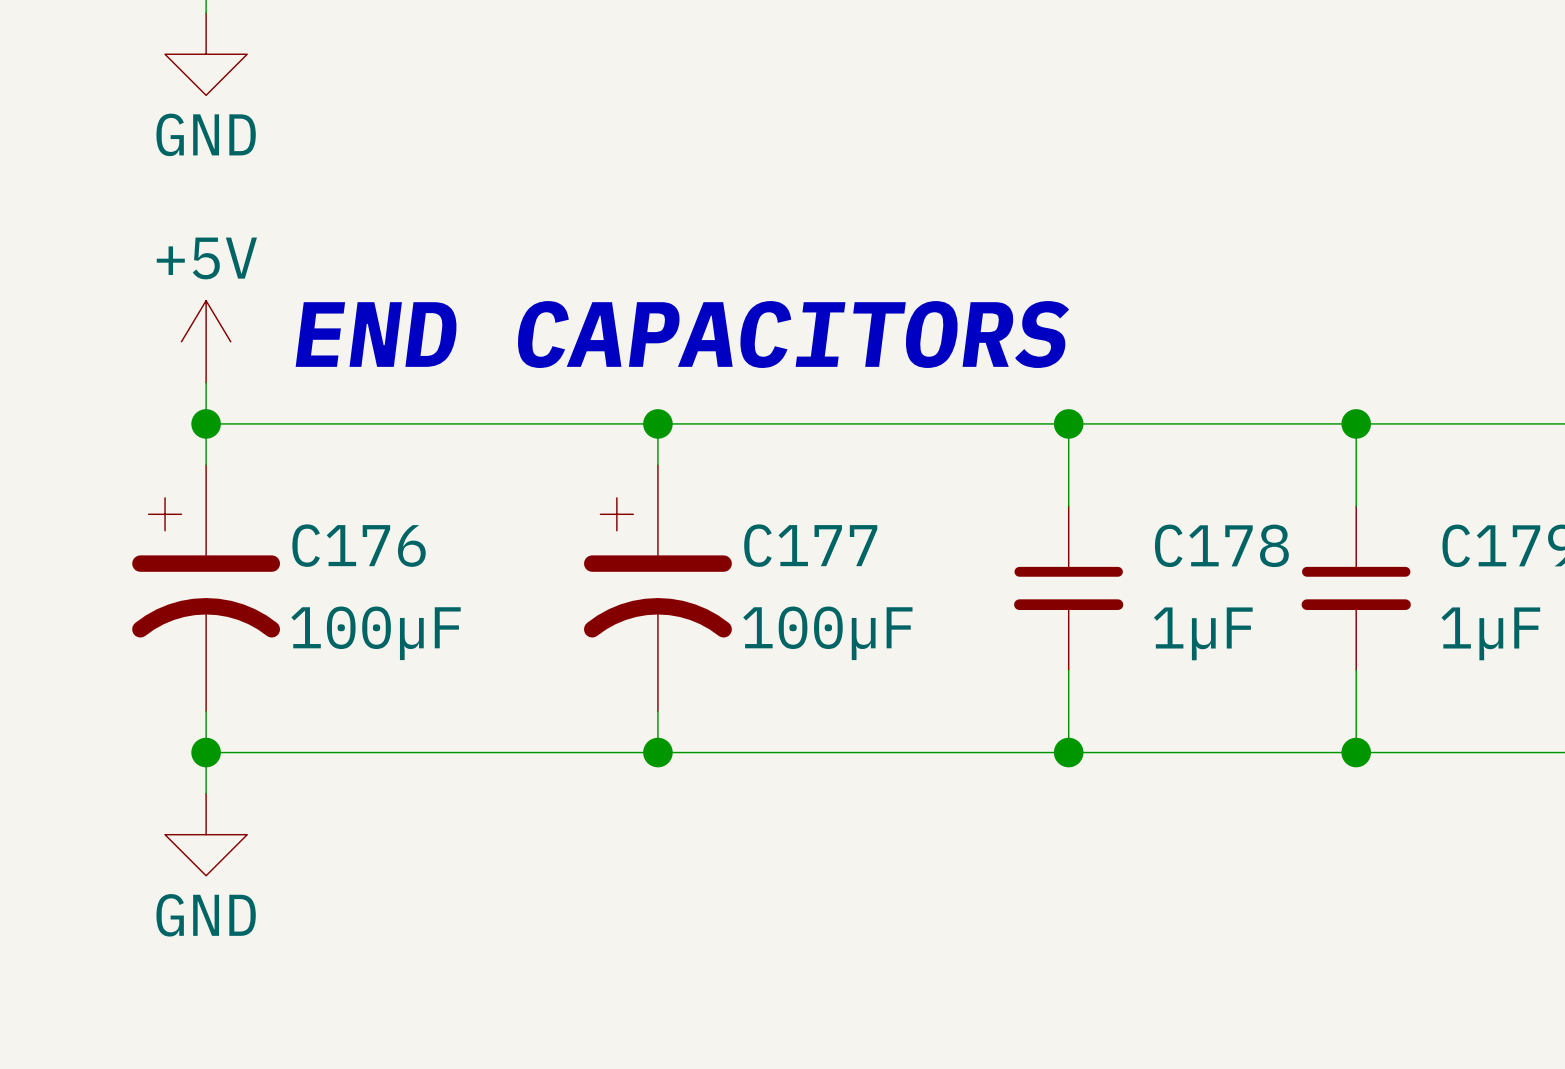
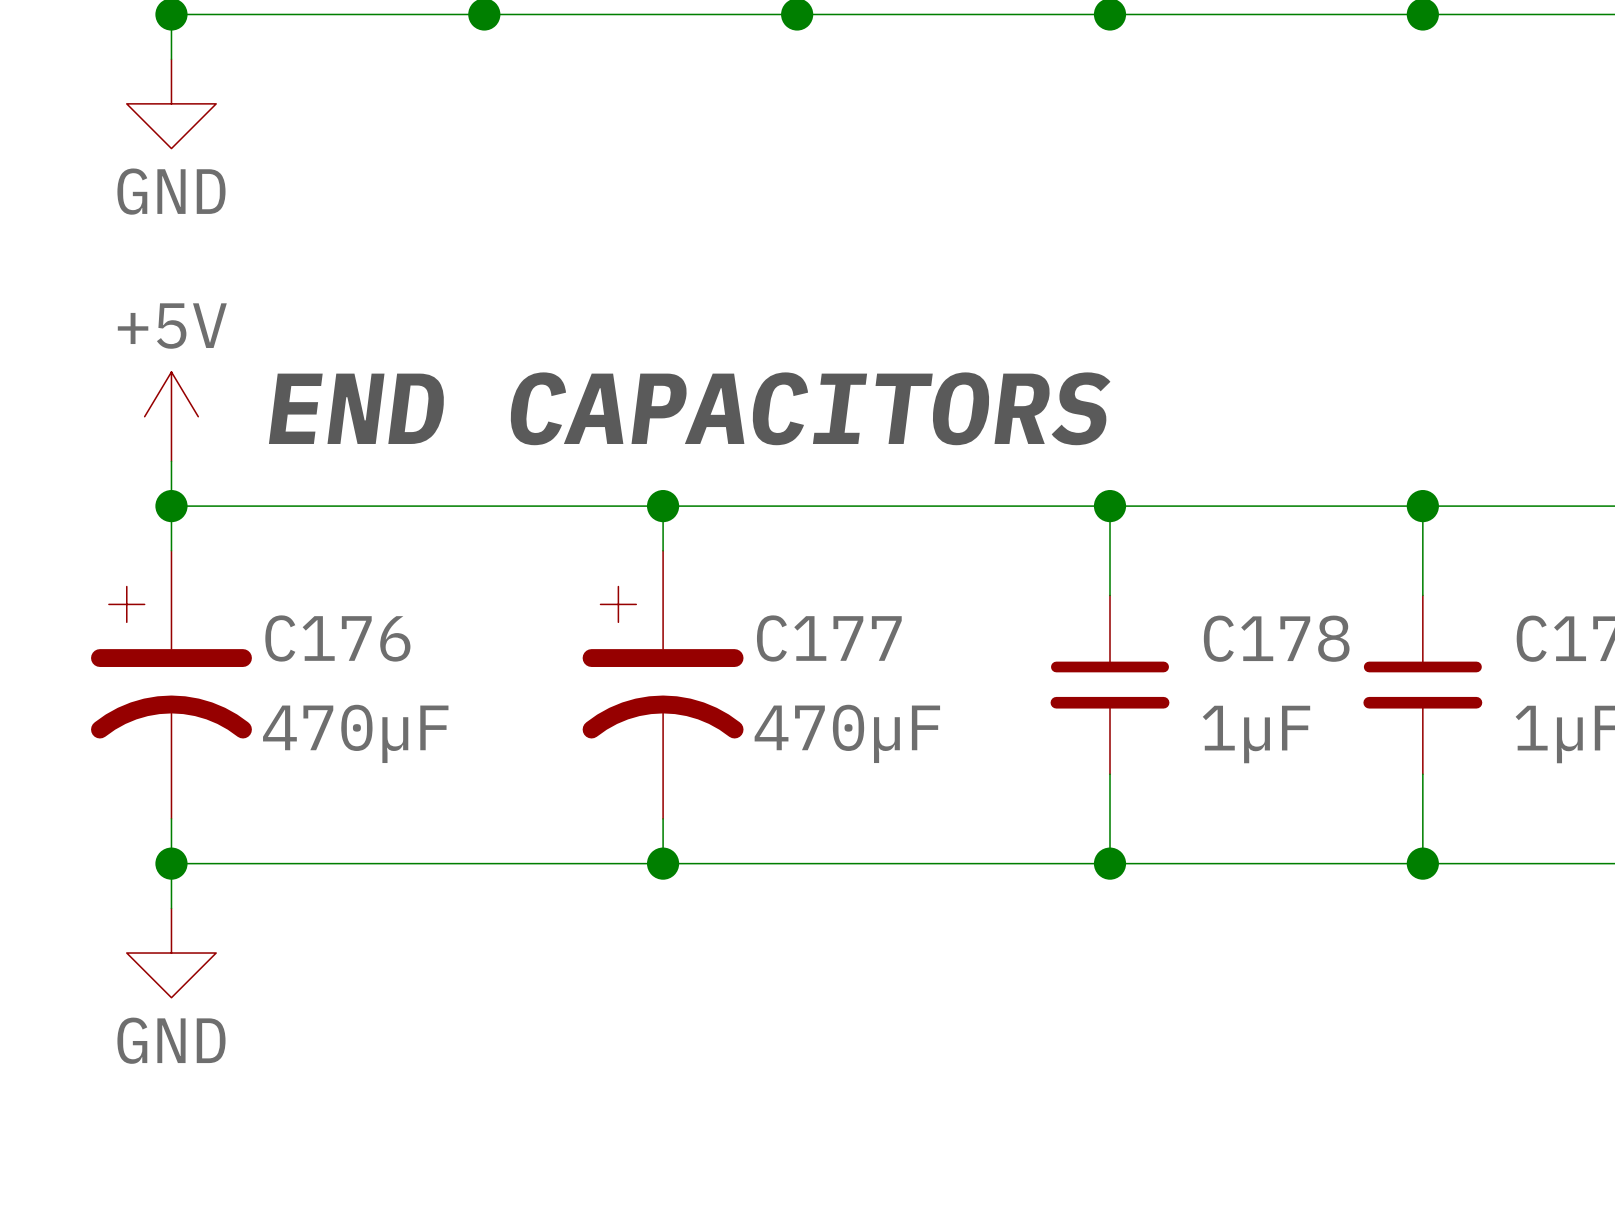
C176 value: 100µF (376, 633) -> 470µF (355, 733)
C177 value: 100µF (827, 633) -> 470µF (847, 733)

